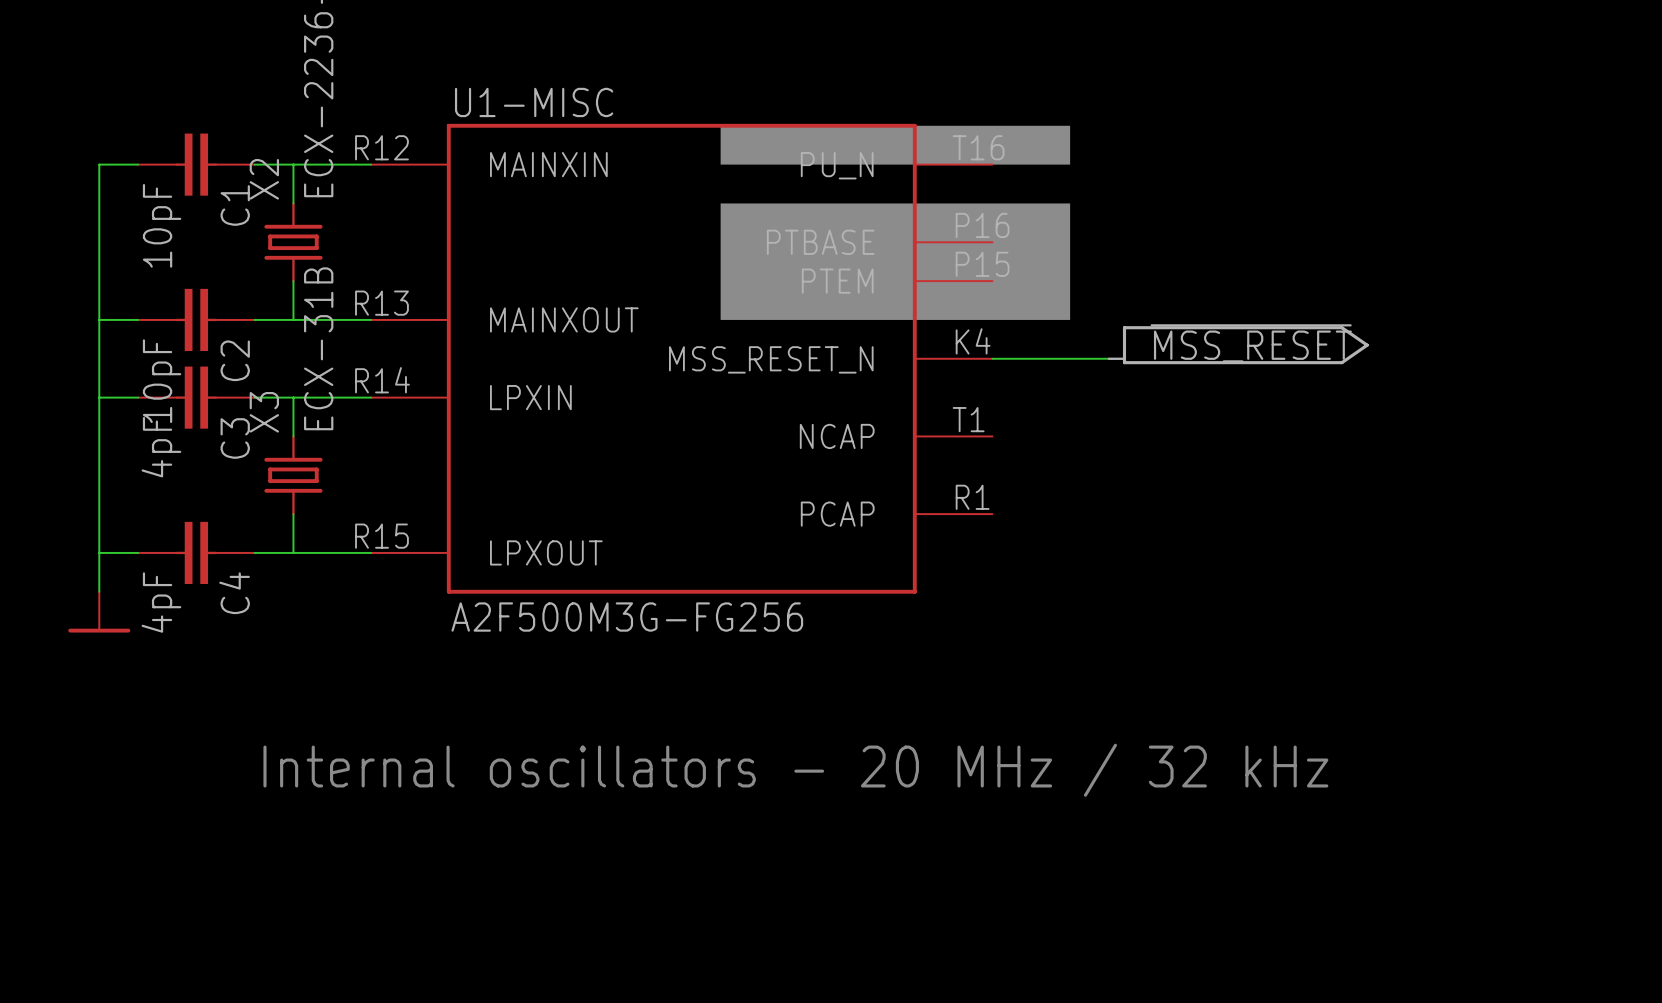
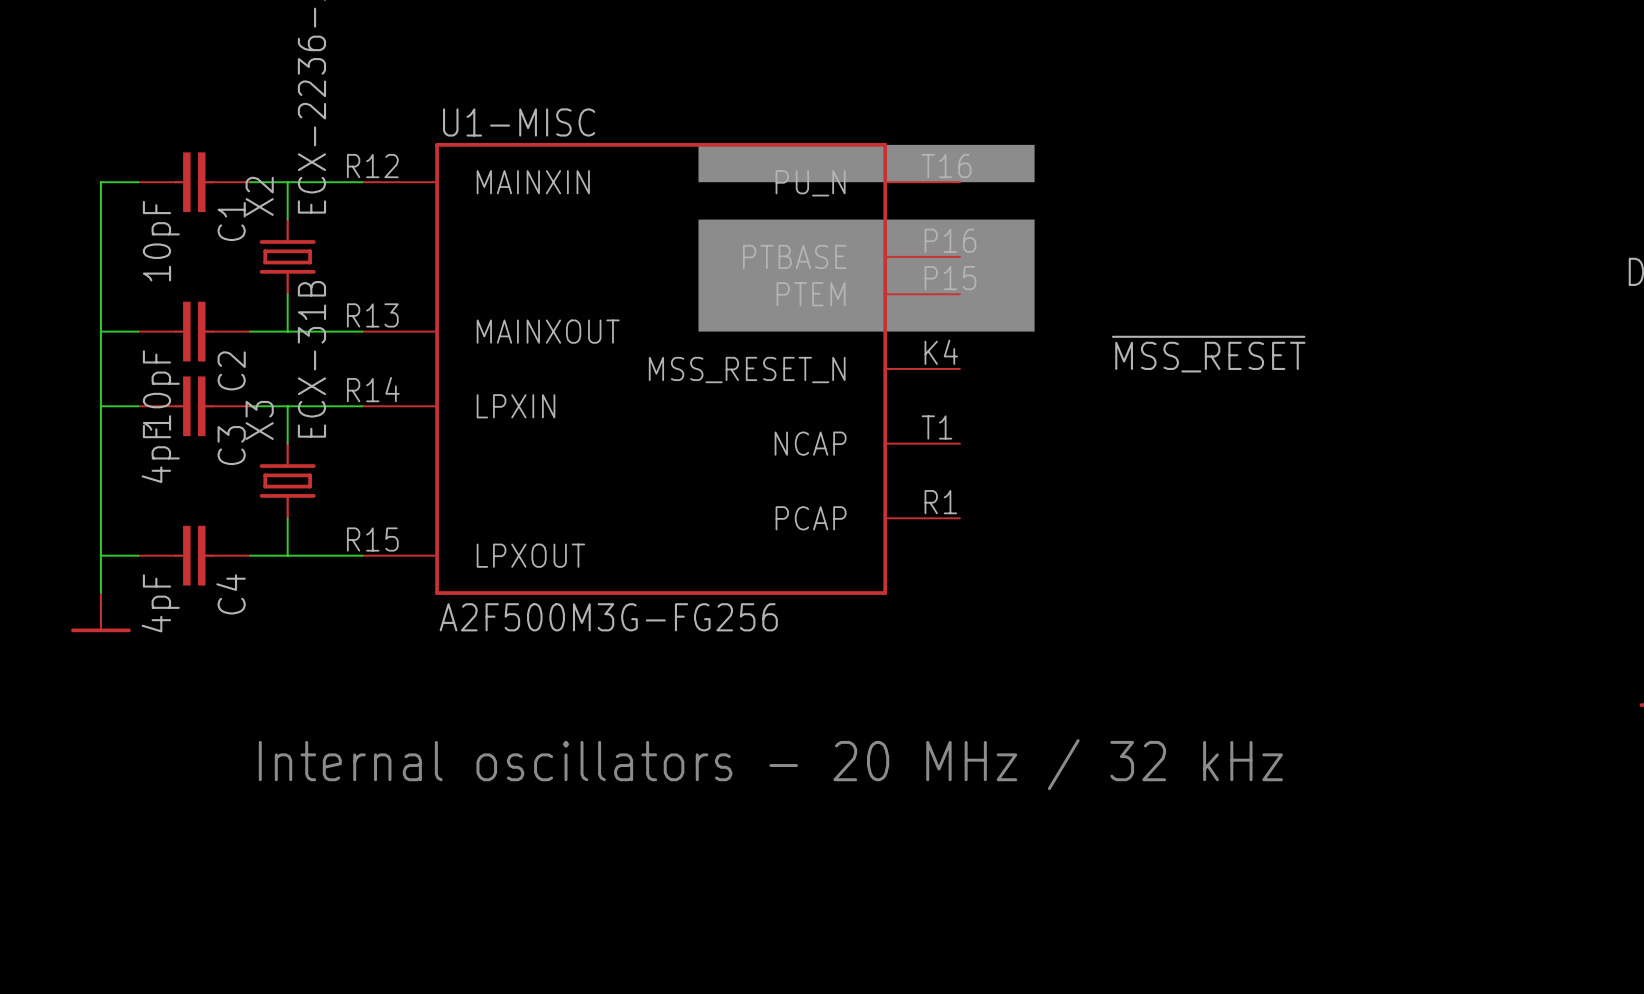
part: (1238, 345) -> none
wire: (992, 358) (1108, 358) -> none

